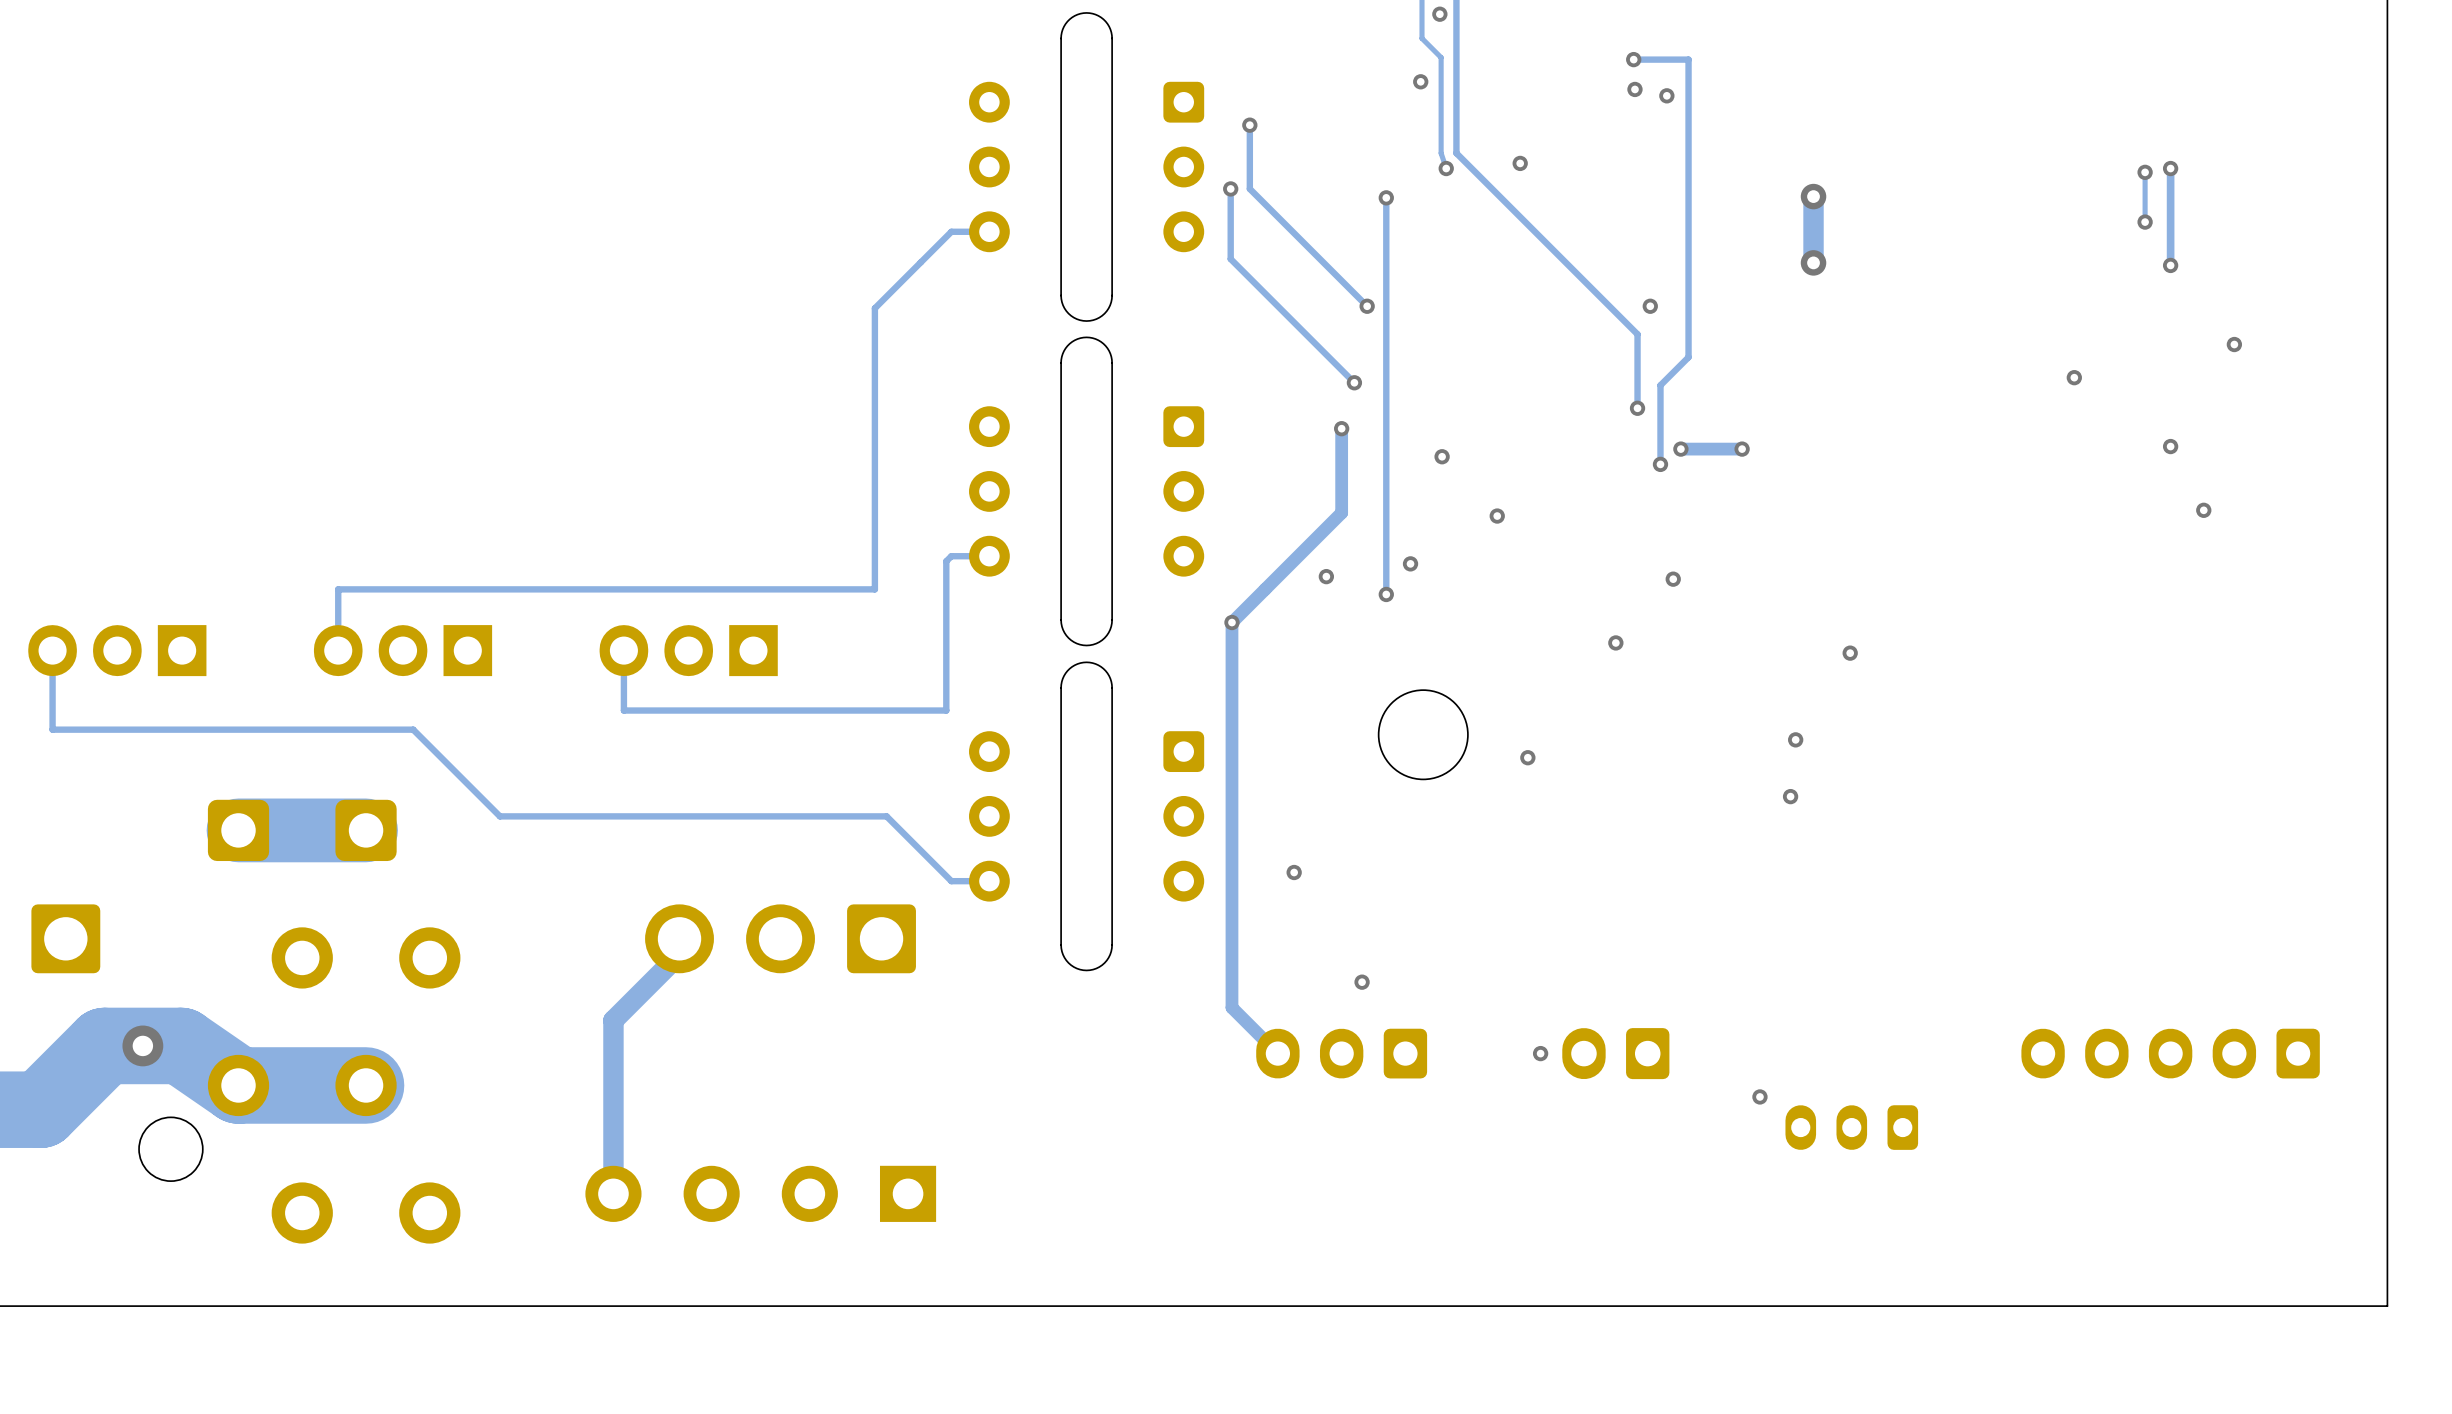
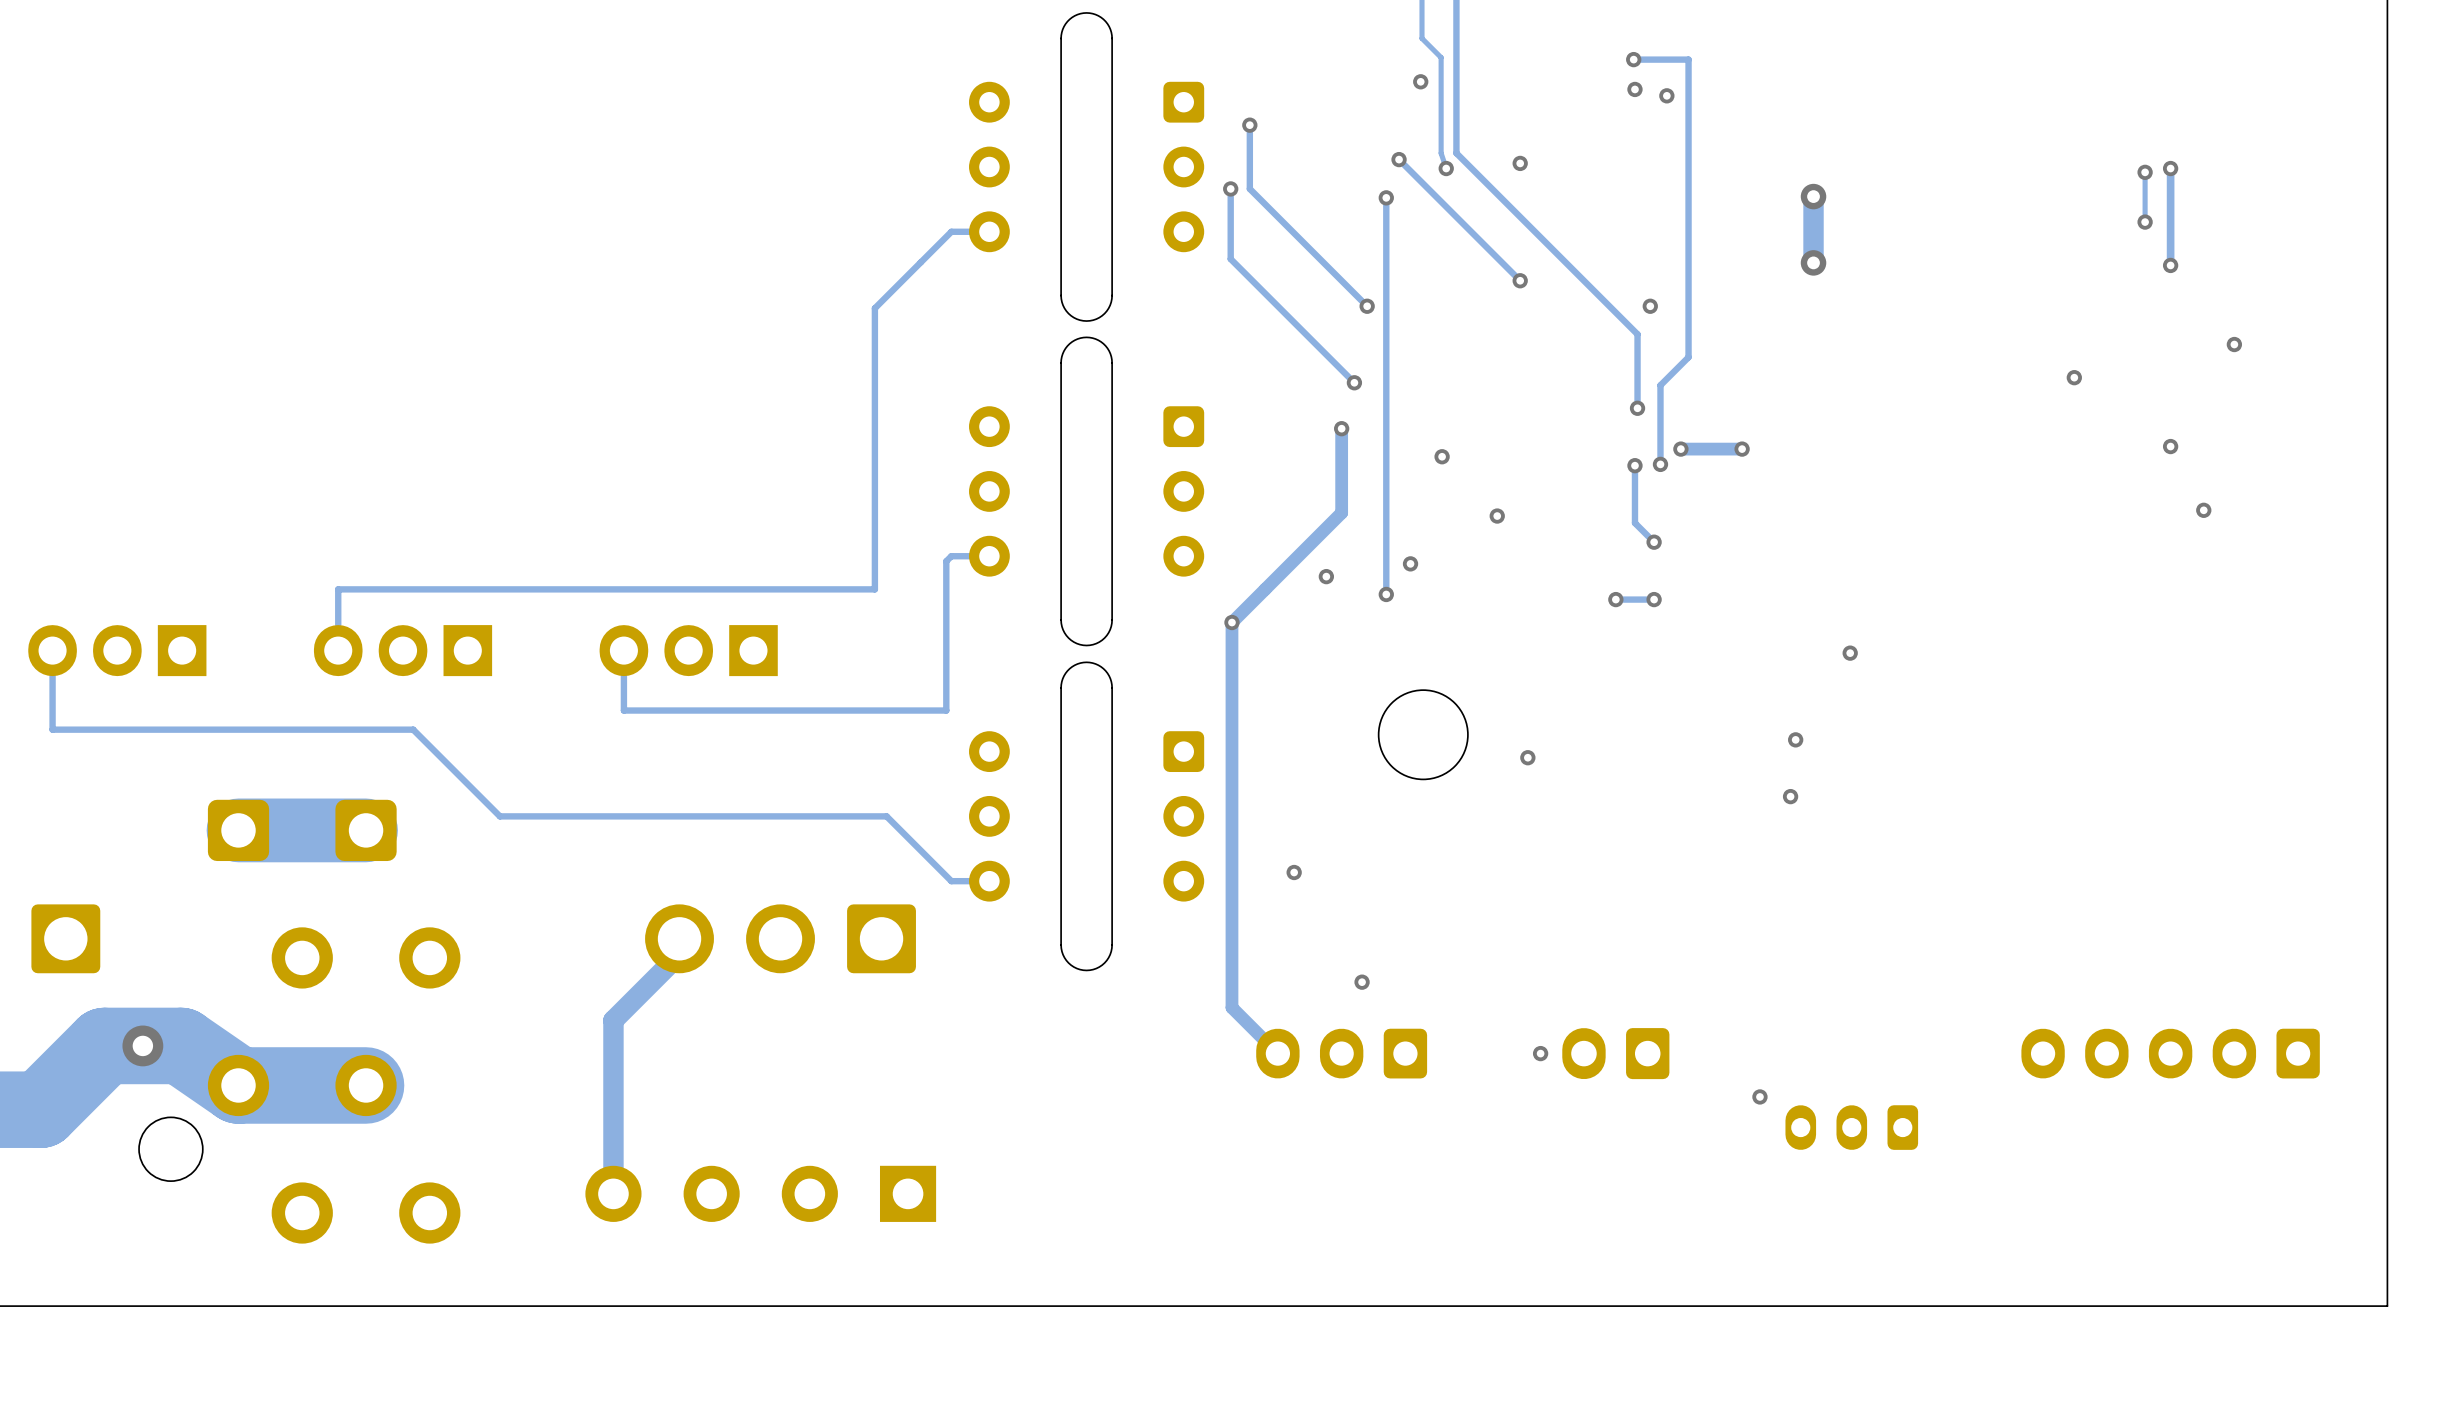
via: (1439, 14) -> none
track: none -> (1399, 159) (1520, 280)
via: none -> (1399, 159)
via: none -> (1520, 280)
track: none -> (1634, 465) (1634, 523) (1654, 542)
via: none -> (1634, 465)
via: none -> (1654, 542)
via: (1673, 579) -> none
via: none -> (1615, 599)
track: none -> (1654, 599) (1615, 599)
via: none -> (1654, 599)
via: (1615, 642) -> none

